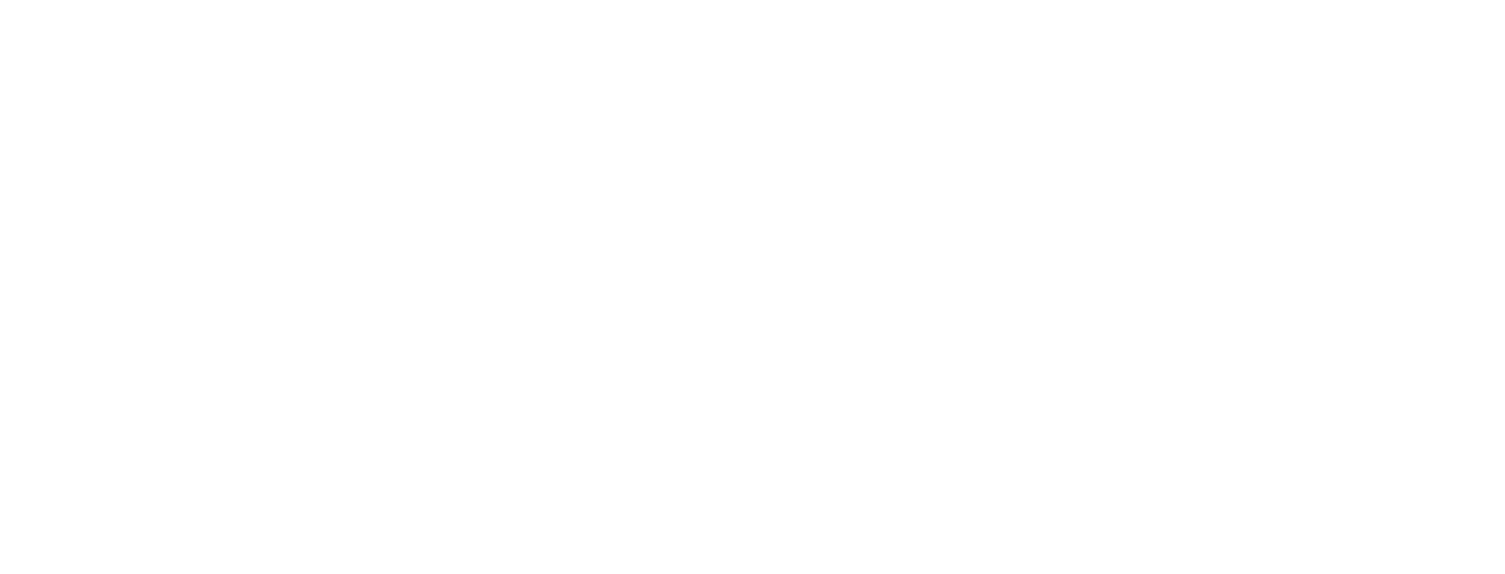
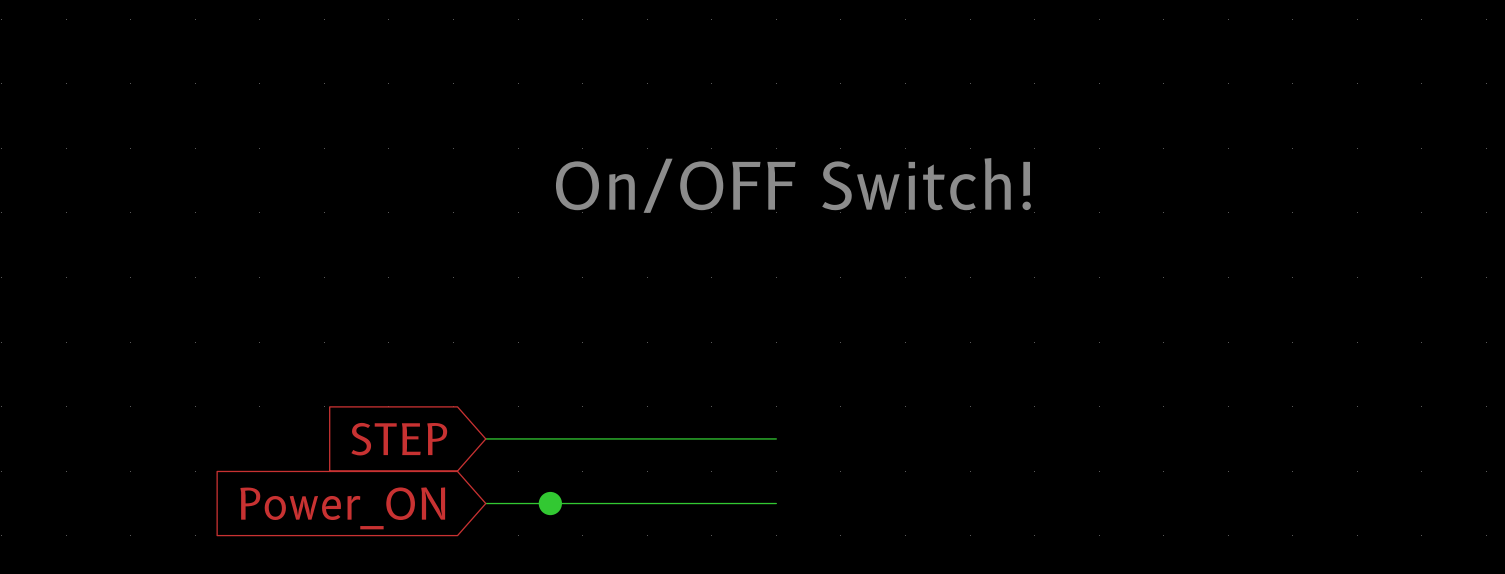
text: none -> On/OFF Switch! (793, 185)
global label: none -> STEP (399, 439)
wire: none -> (485, 438) (776, 438)
wire: none -> (485, 503) (776, 503)
junction: none -> (550, 503)
global label: none -> Power_ON (342, 508)

